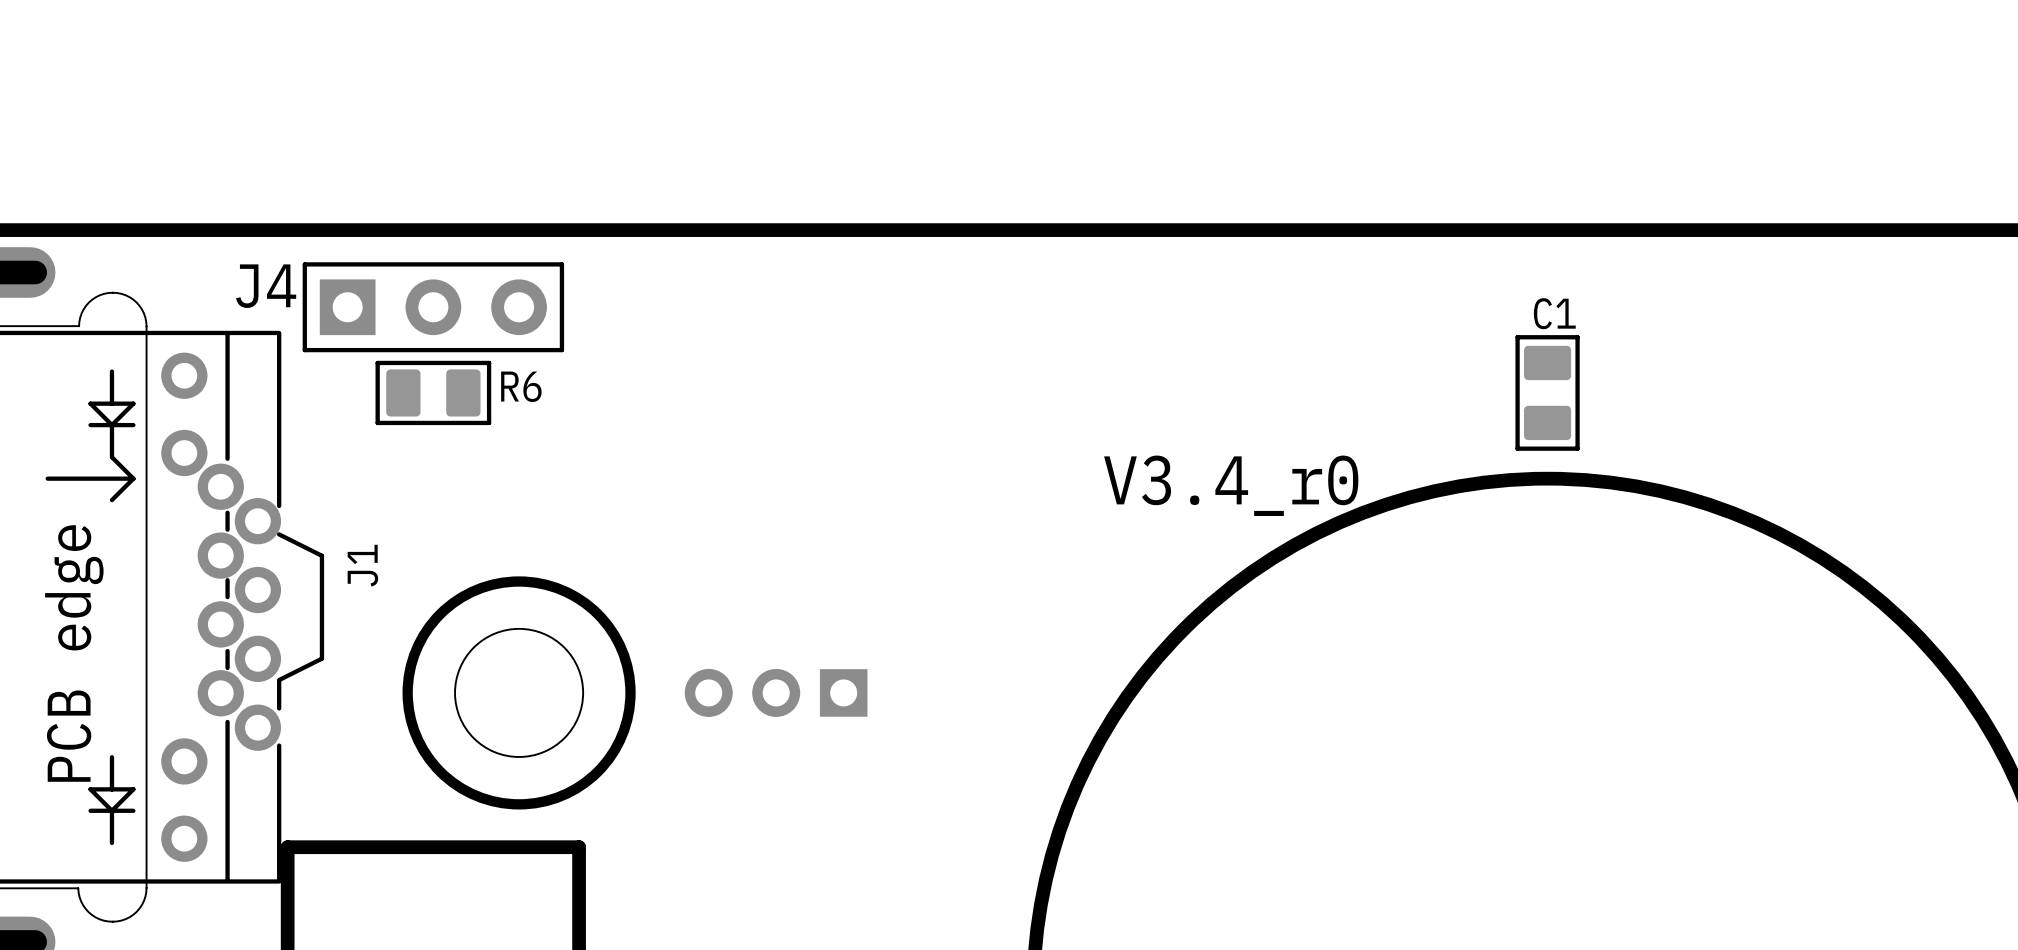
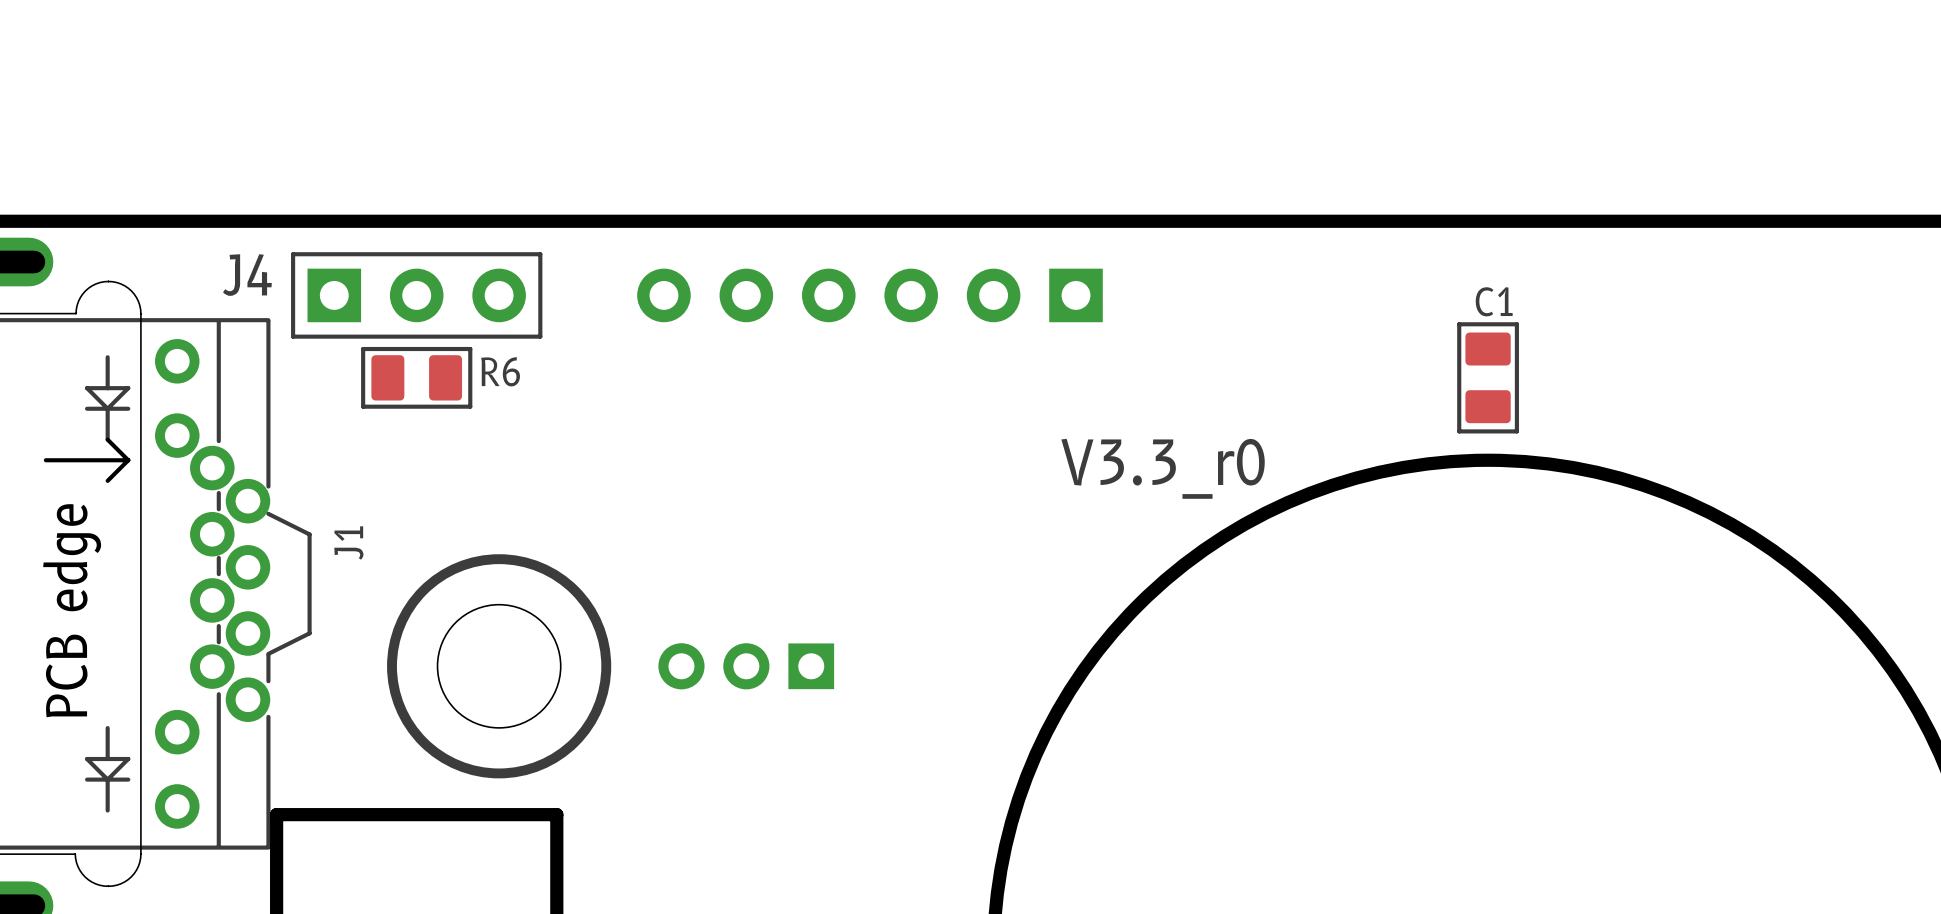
part: none -> (869, 295)
text: V3.4_r0 (1231, 485) -> V3.3_r0 (1163, 468)

